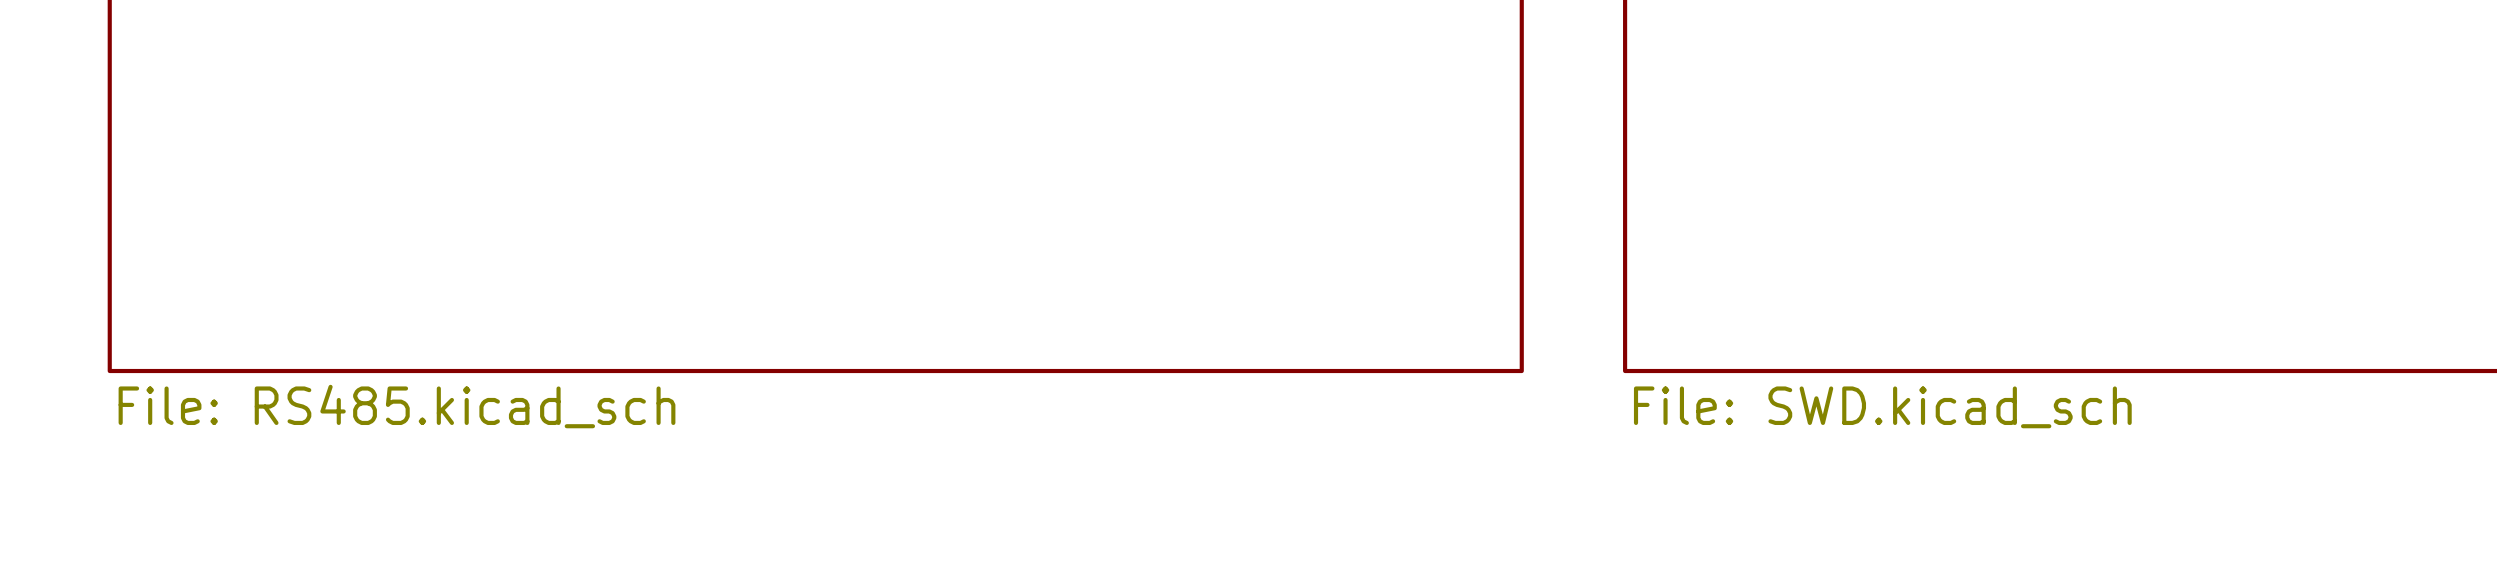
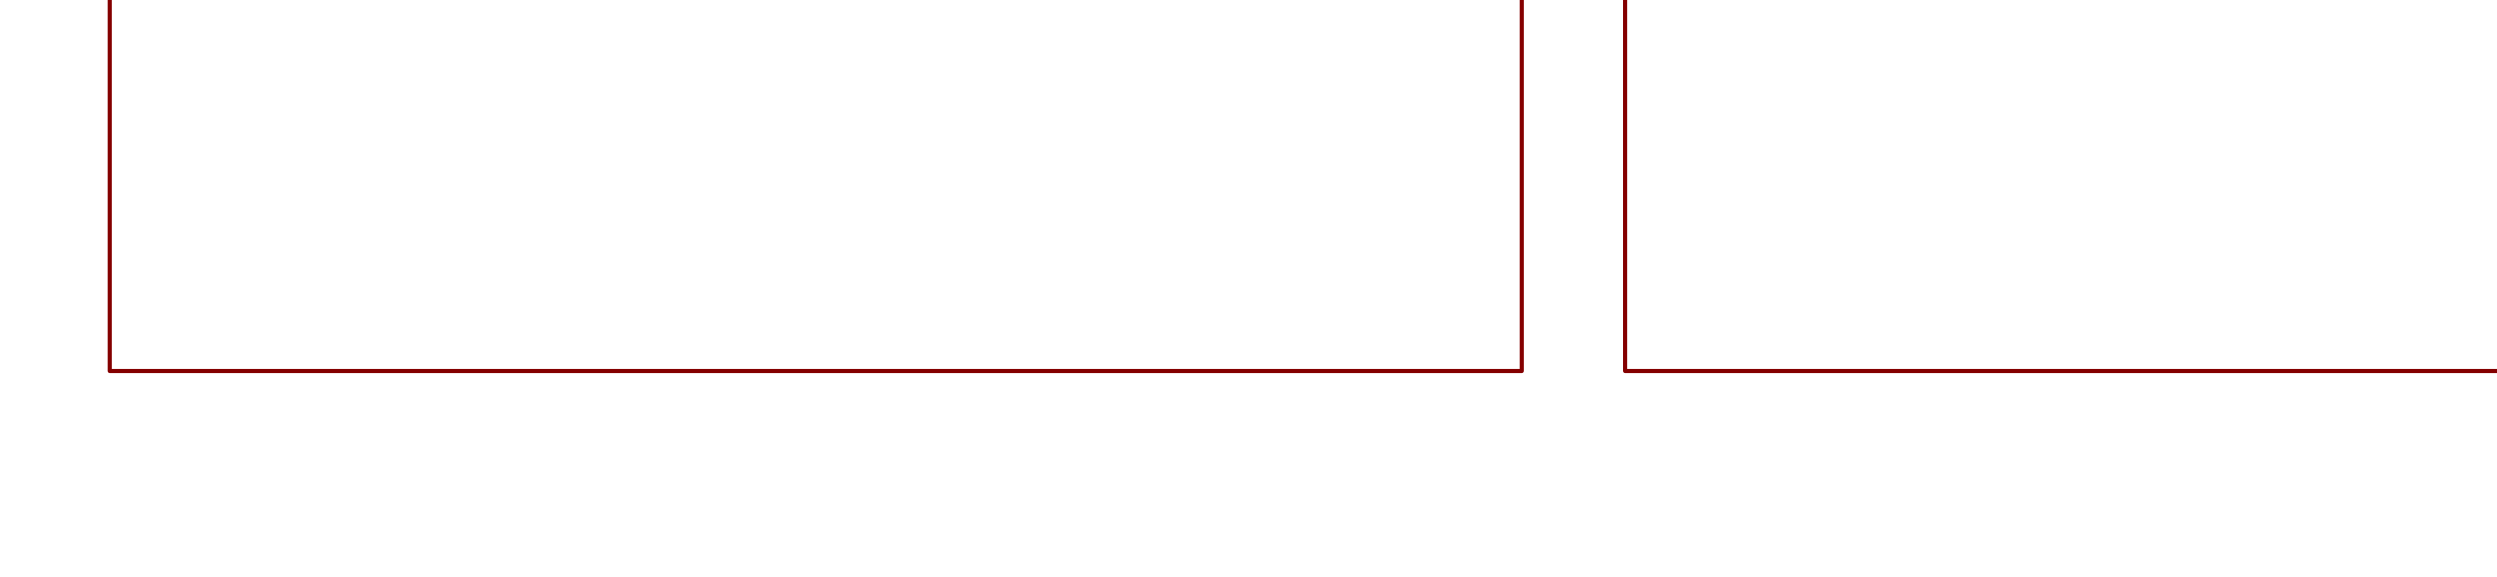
sheet value: File: RS485.kicad_sch (397, 406) -> none
sheet value: File: SWD.kicad_sch (1882, 407) -> none

